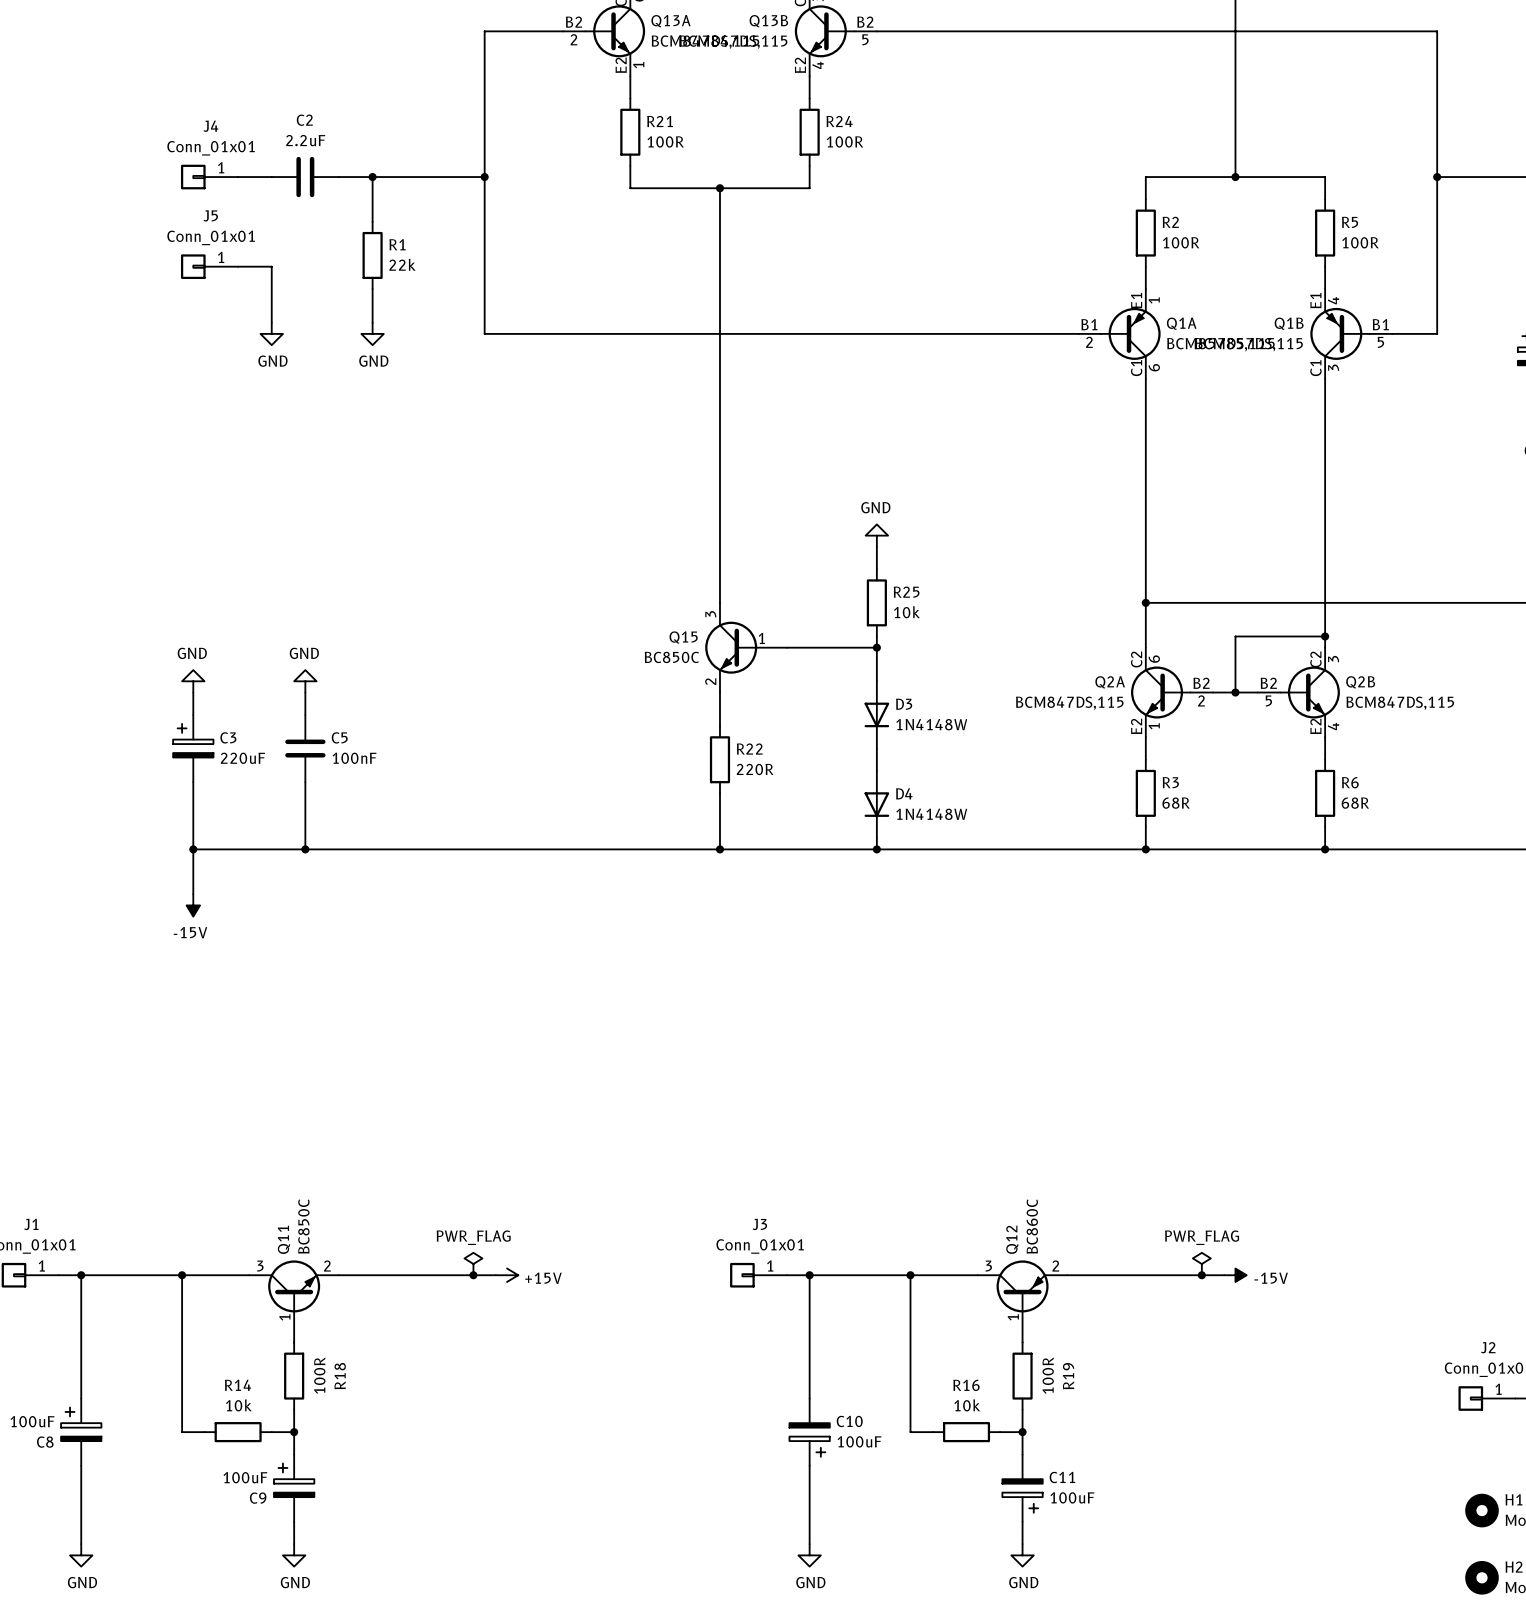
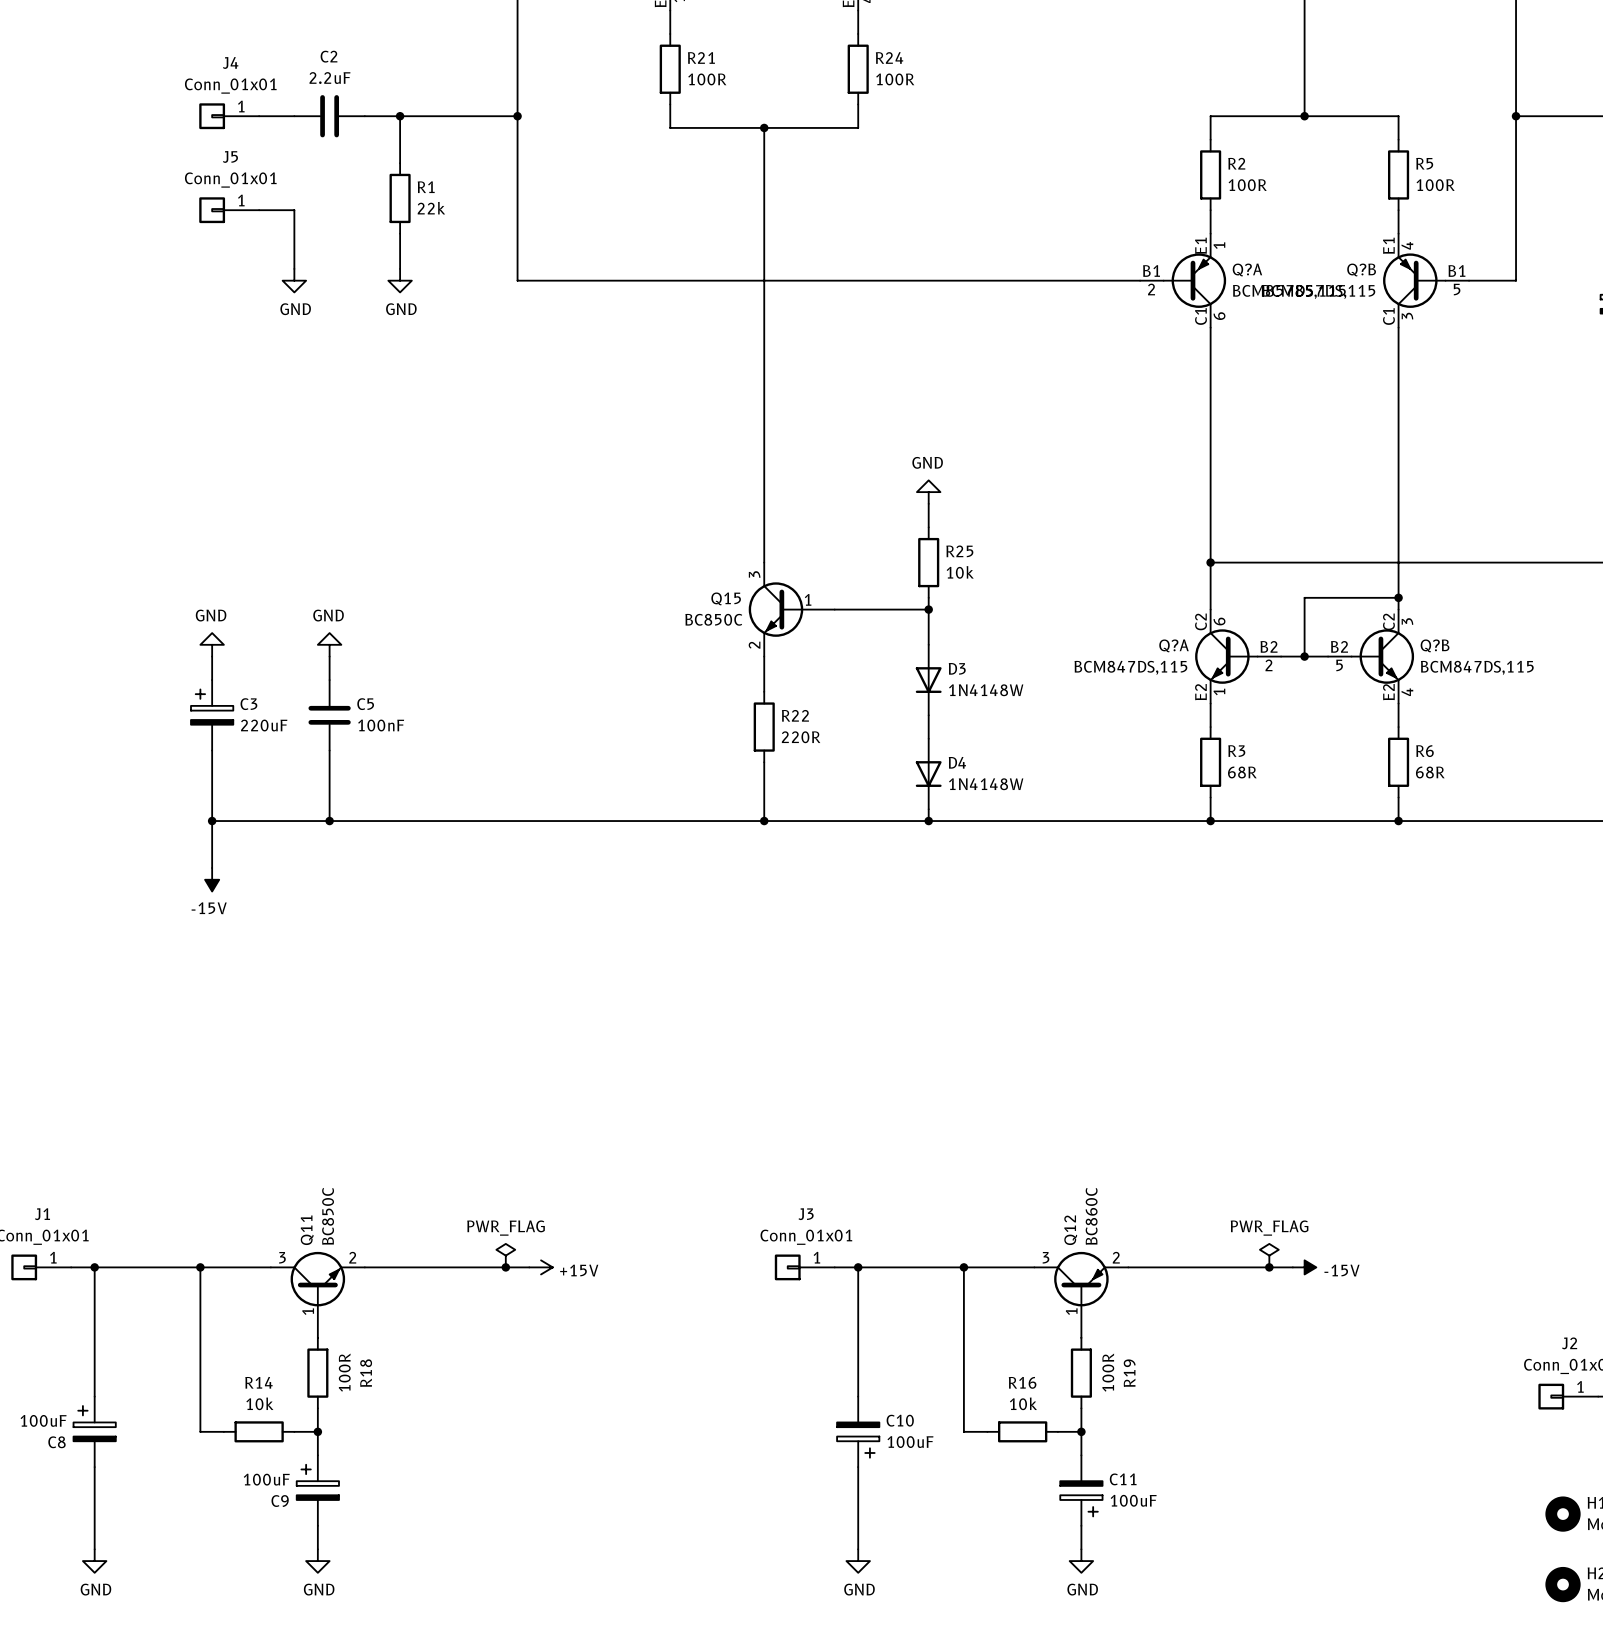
Q1A name: Q1A (1181, 323) -> Q?A (1247, 269)
Q1B name: Q1B (1289, 323) -> Q?B (1361, 270)
Q2A name: Q2A (1110, 682) -> Q?A (1174, 645)
Q2B name: Q2B (1360, 682) -> Q?B (1435, 645)

